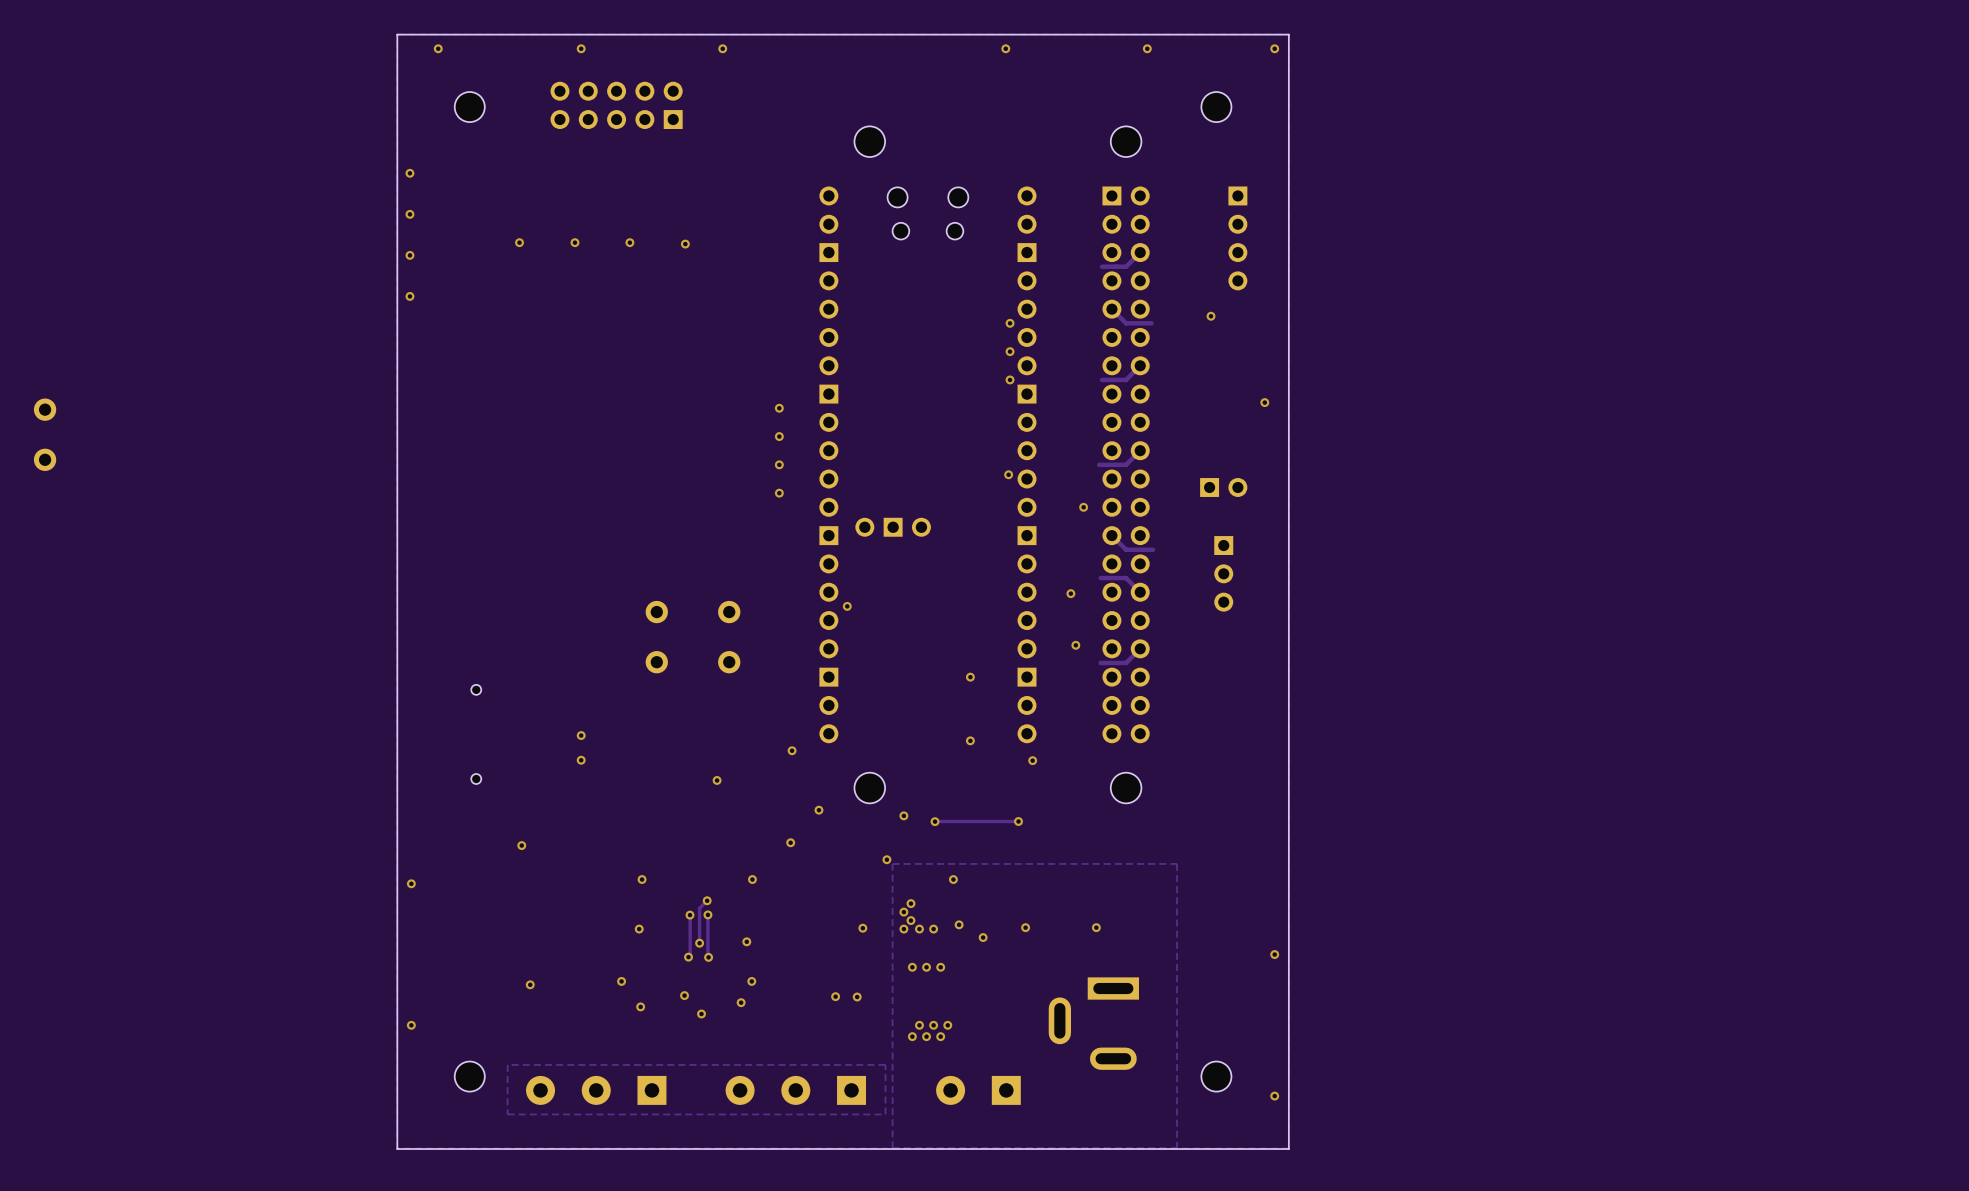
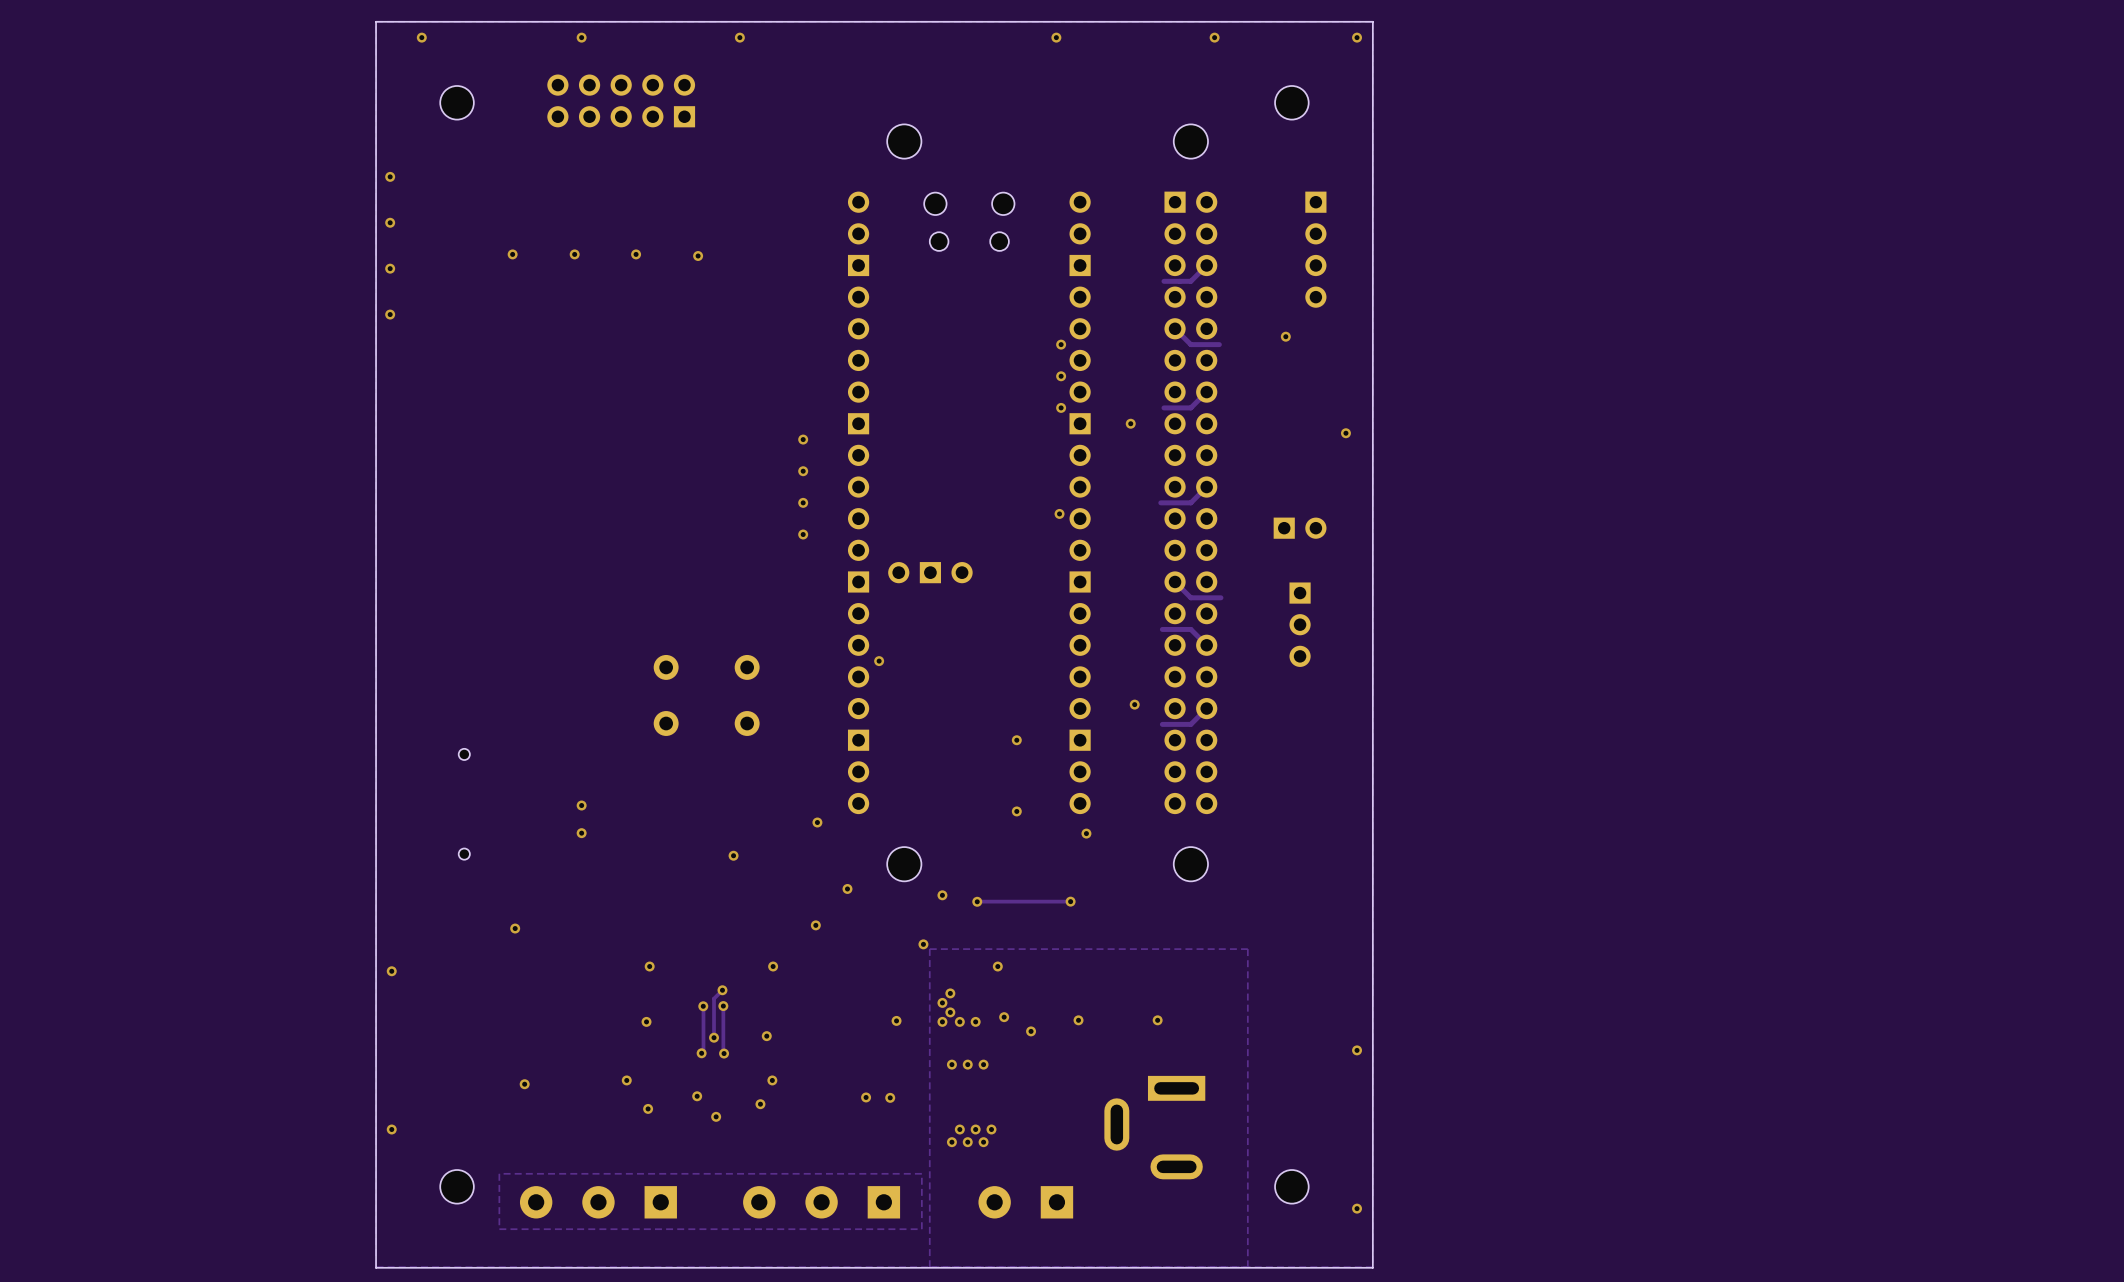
via: none -> (1130, 423)
via: (1083, 507) -> none
via: (1070, 593) -> none

